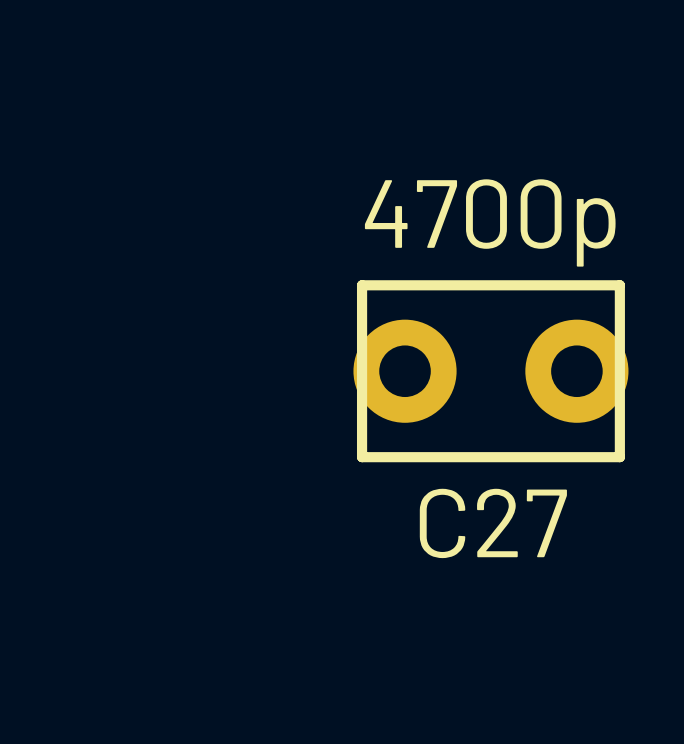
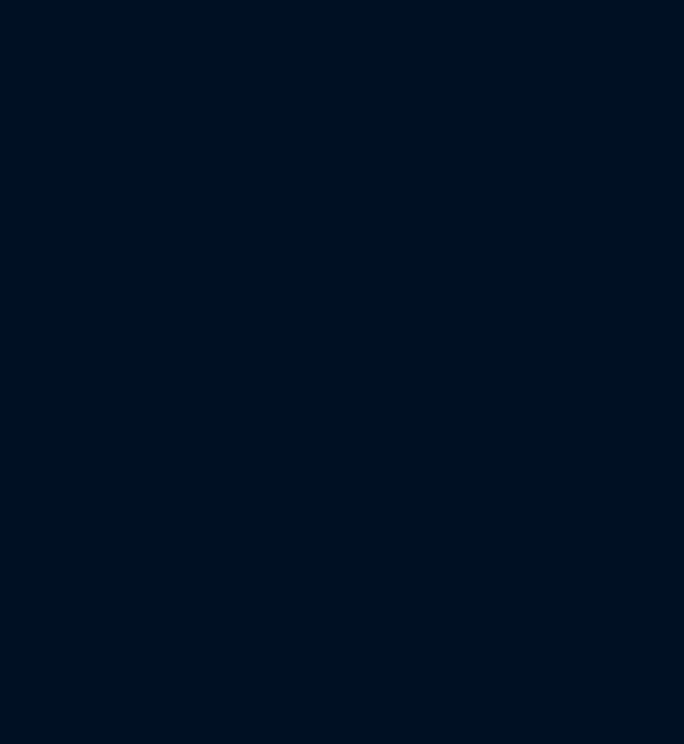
C27: 4700p (490, 371) -> none

